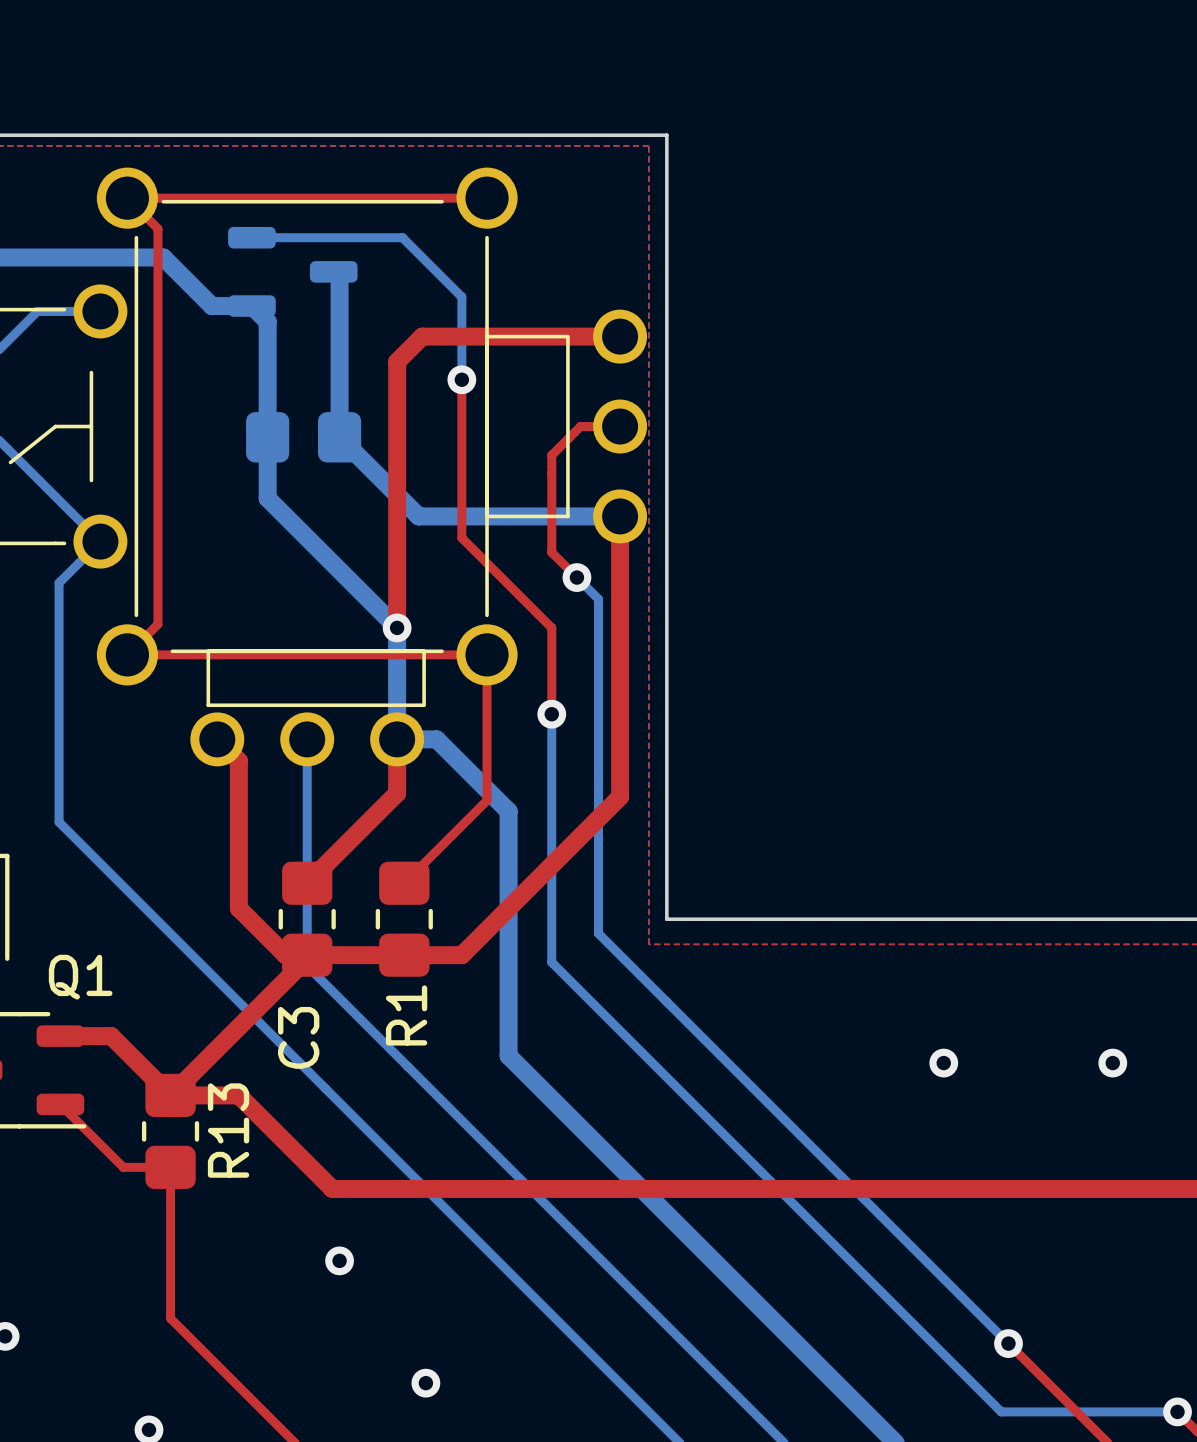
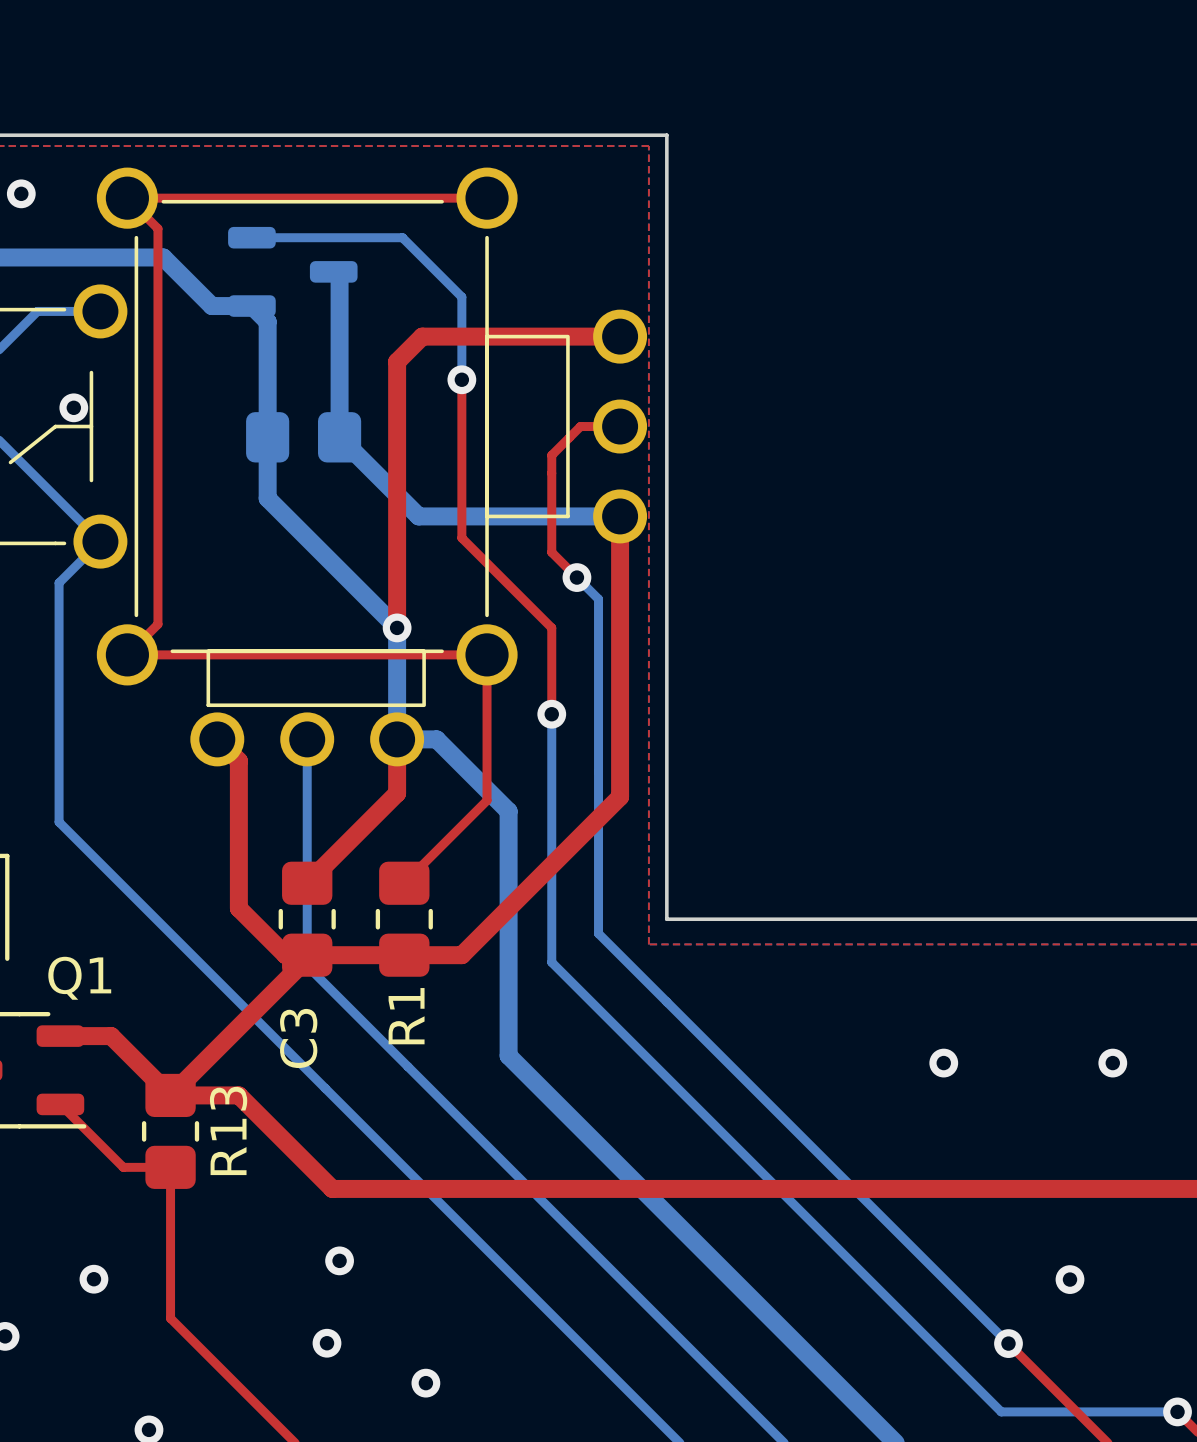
via: none -> (21, 193)
via: none -> (73, 407)
via: none -> (93, 1279)
via: none -> (1069, 1279)
via: none -> (326, 1343)

